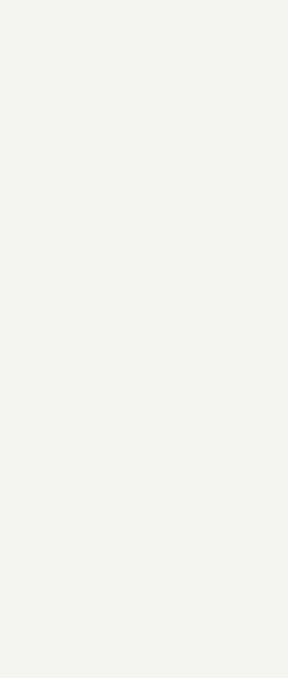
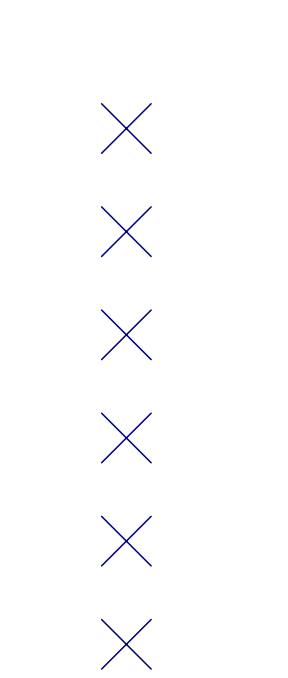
no-connect mark: none -> (126, 128)
no-connect mark: none -> (126, 231)
no-connect mark: none -> (126, 334)
no-connect mark: none -> (126, 437)
no-connect mark: none -> (126, 541)
no-connect mark: none -> (126, 644)

